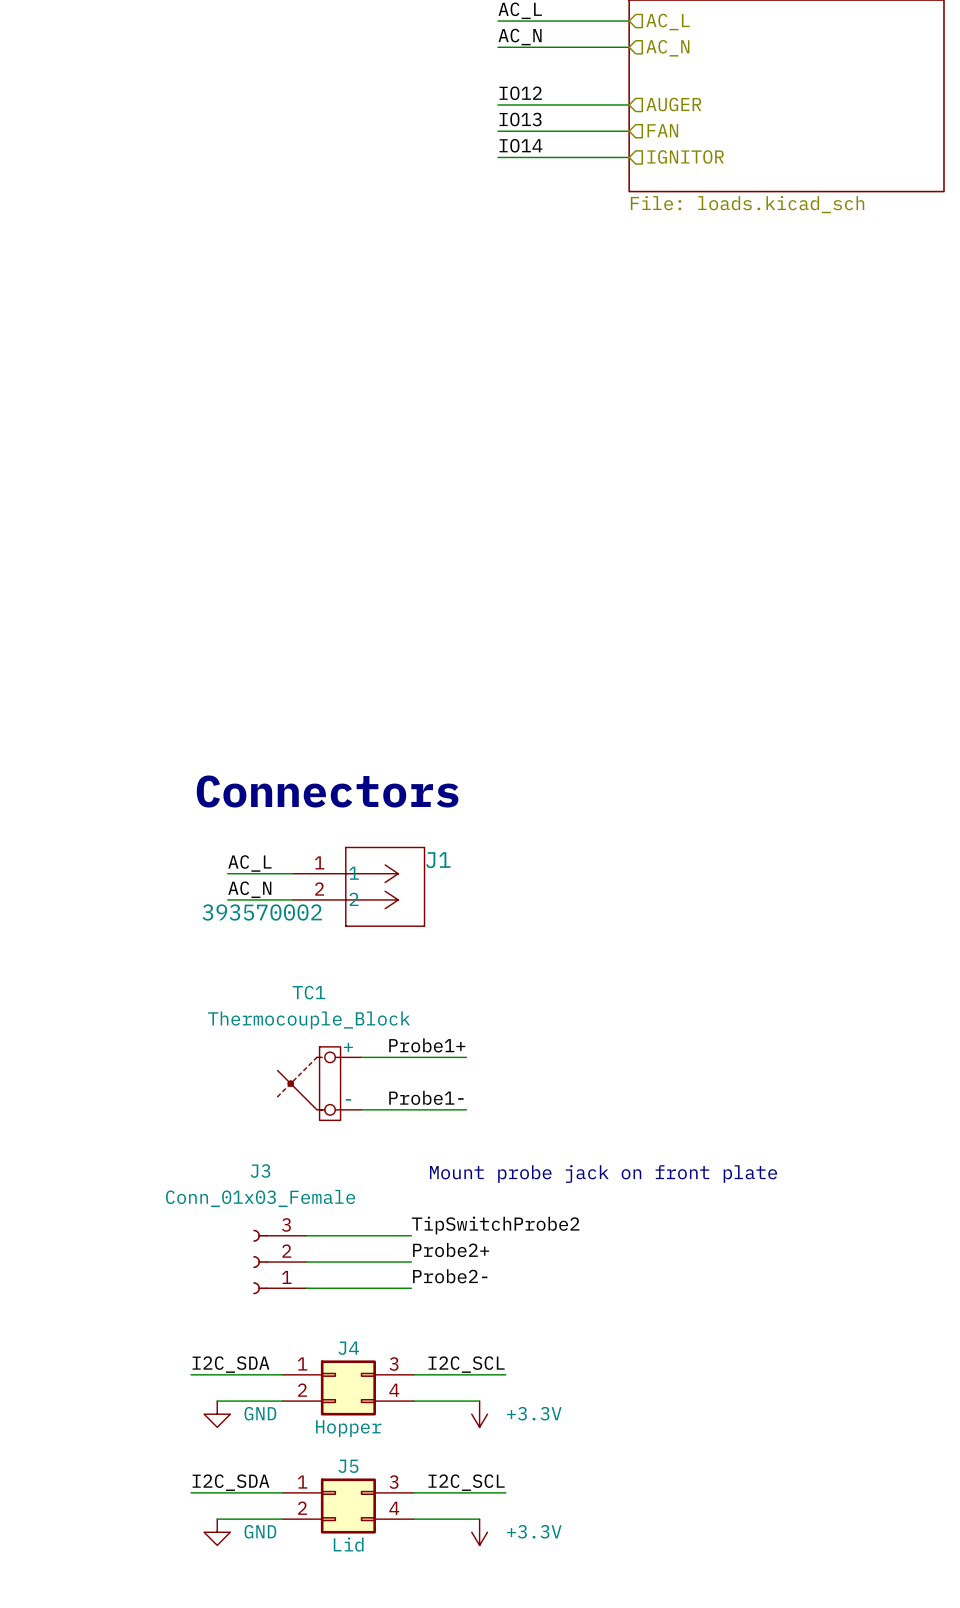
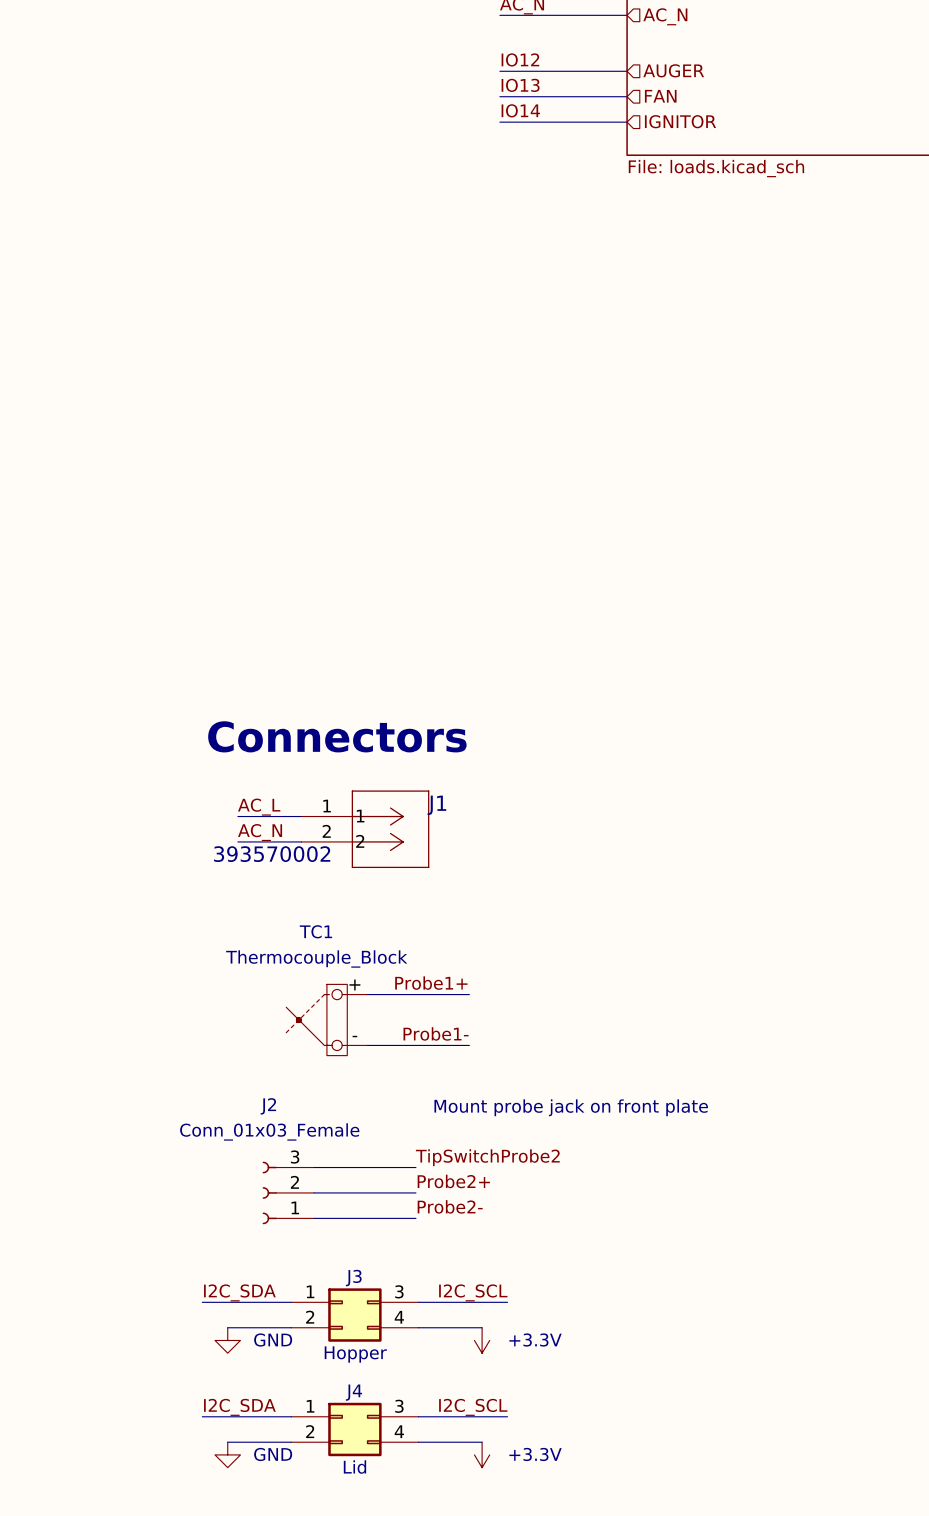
J3 name: J3 (260, 1171) -> J2 (268, 1106)
J4 name: J4 (348, 1348) -> J3 (353, 1278)
J5 name: J5 (348, 1466) -> J4 (353, 1392)

